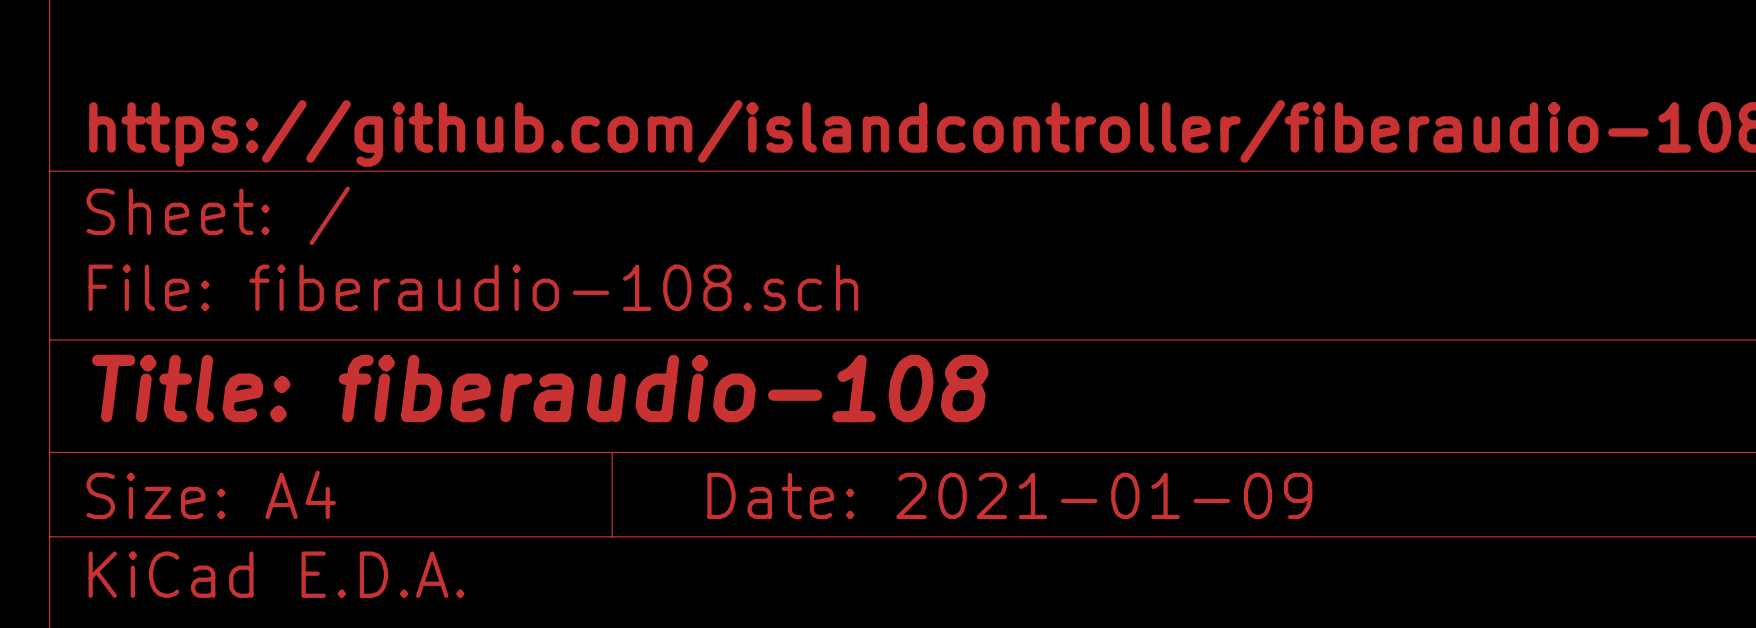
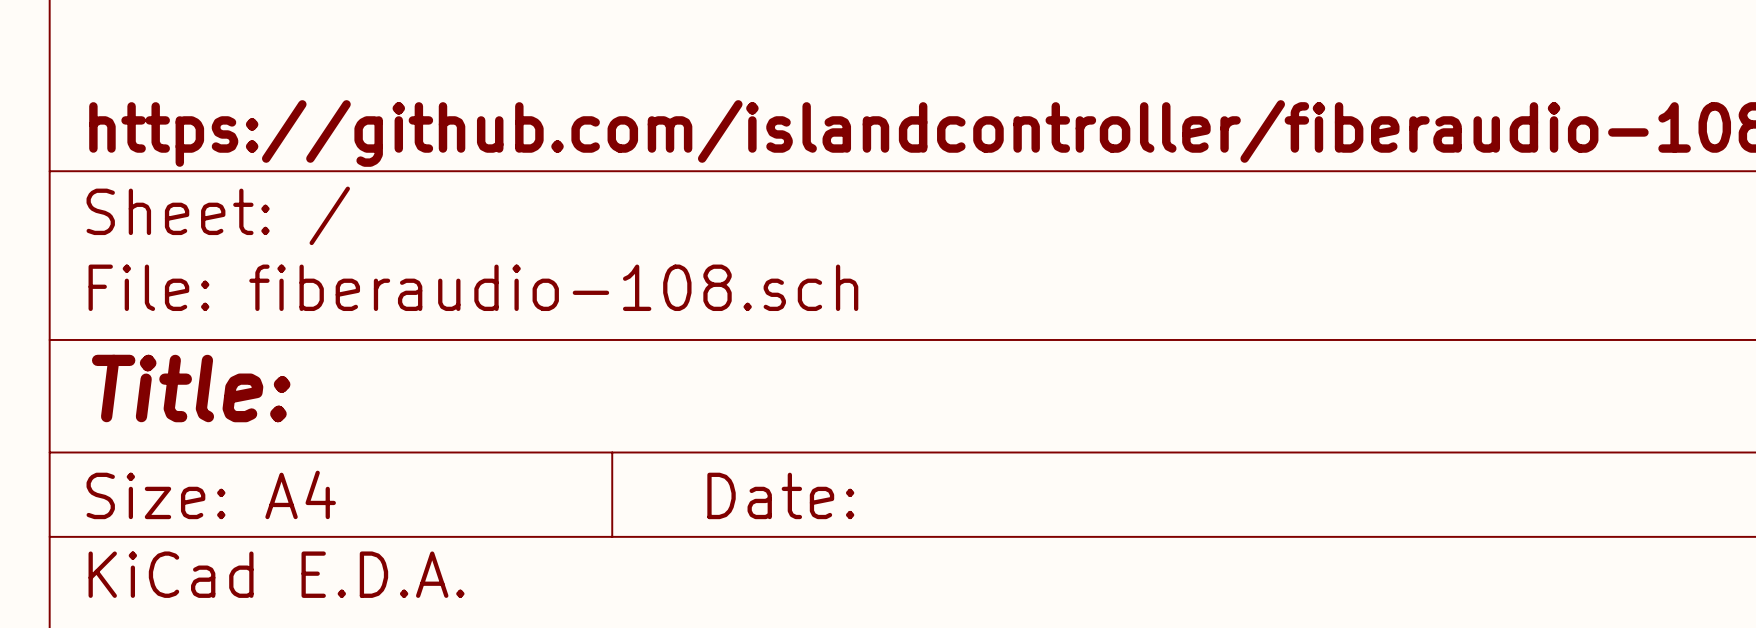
title block: Title: fiberaudio-108 (540, 388) -> Title: (191, 388)
title block: Date: 2021-01-09 (1009, 495) -> Date: (780, 495)

